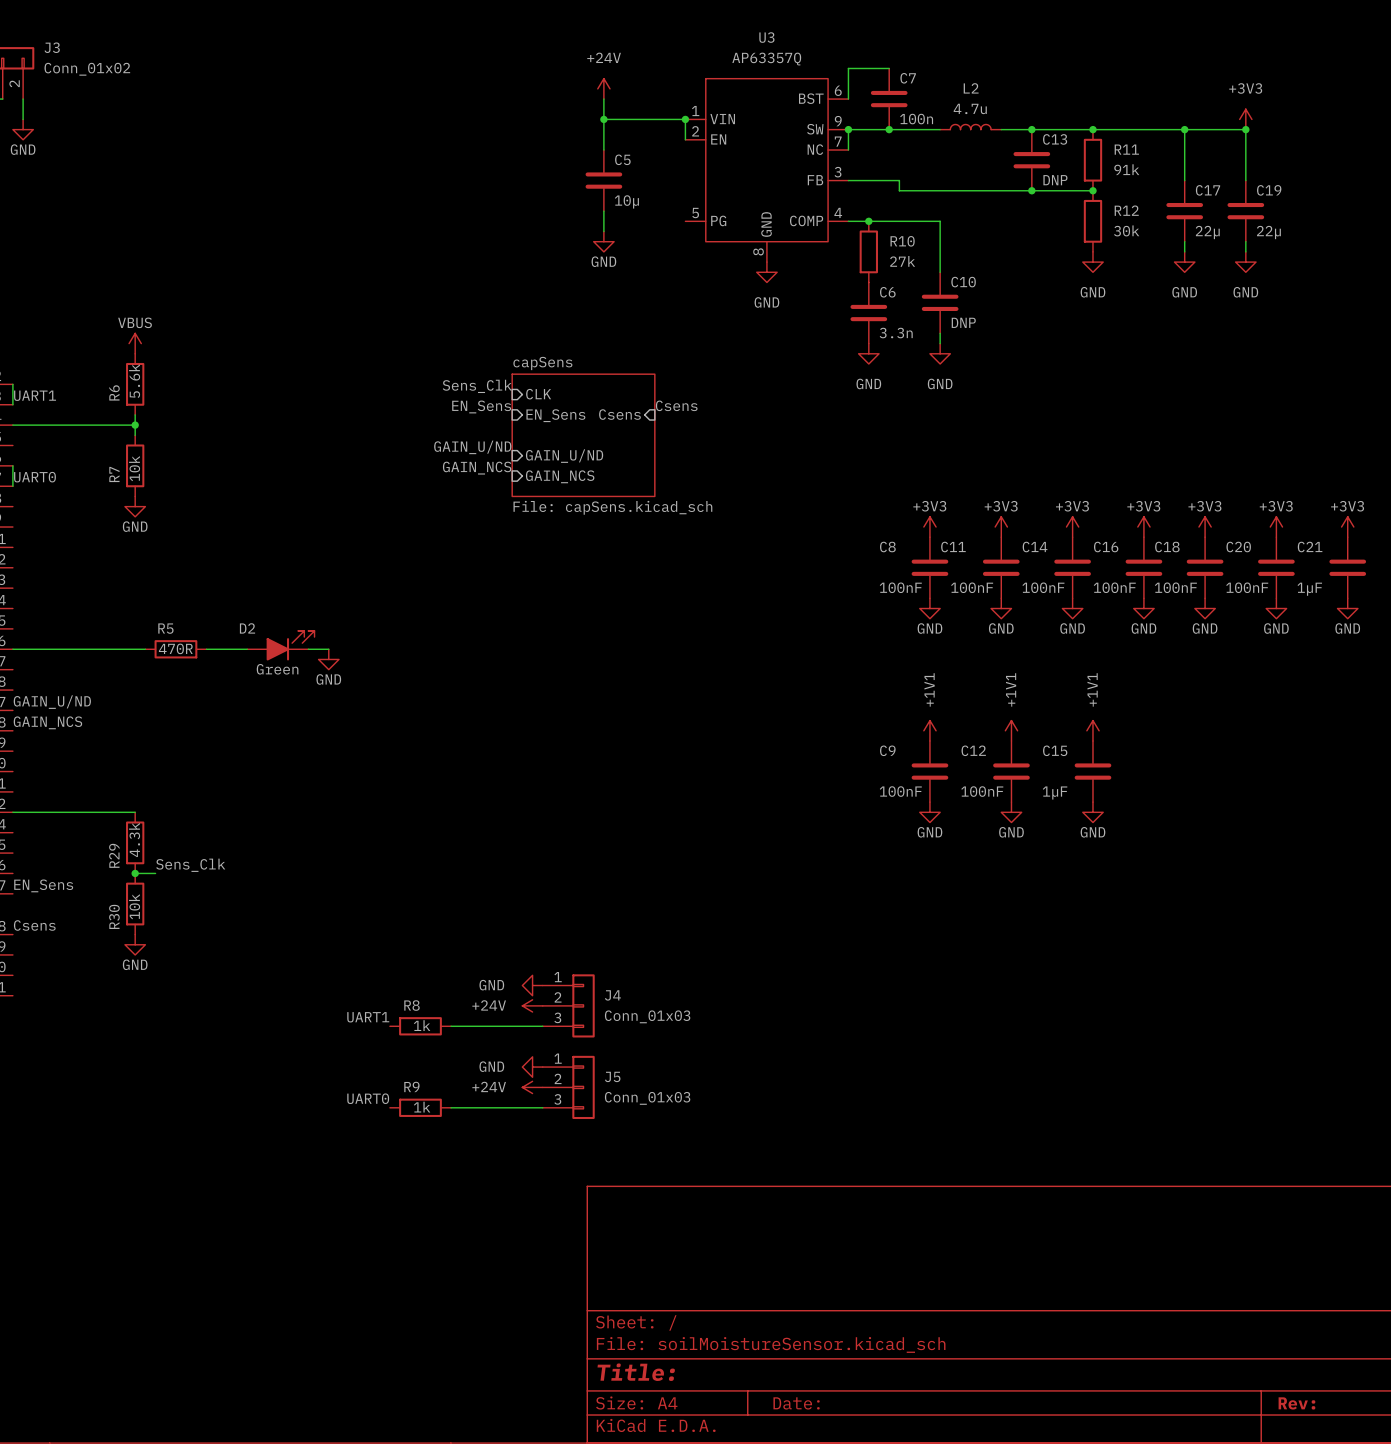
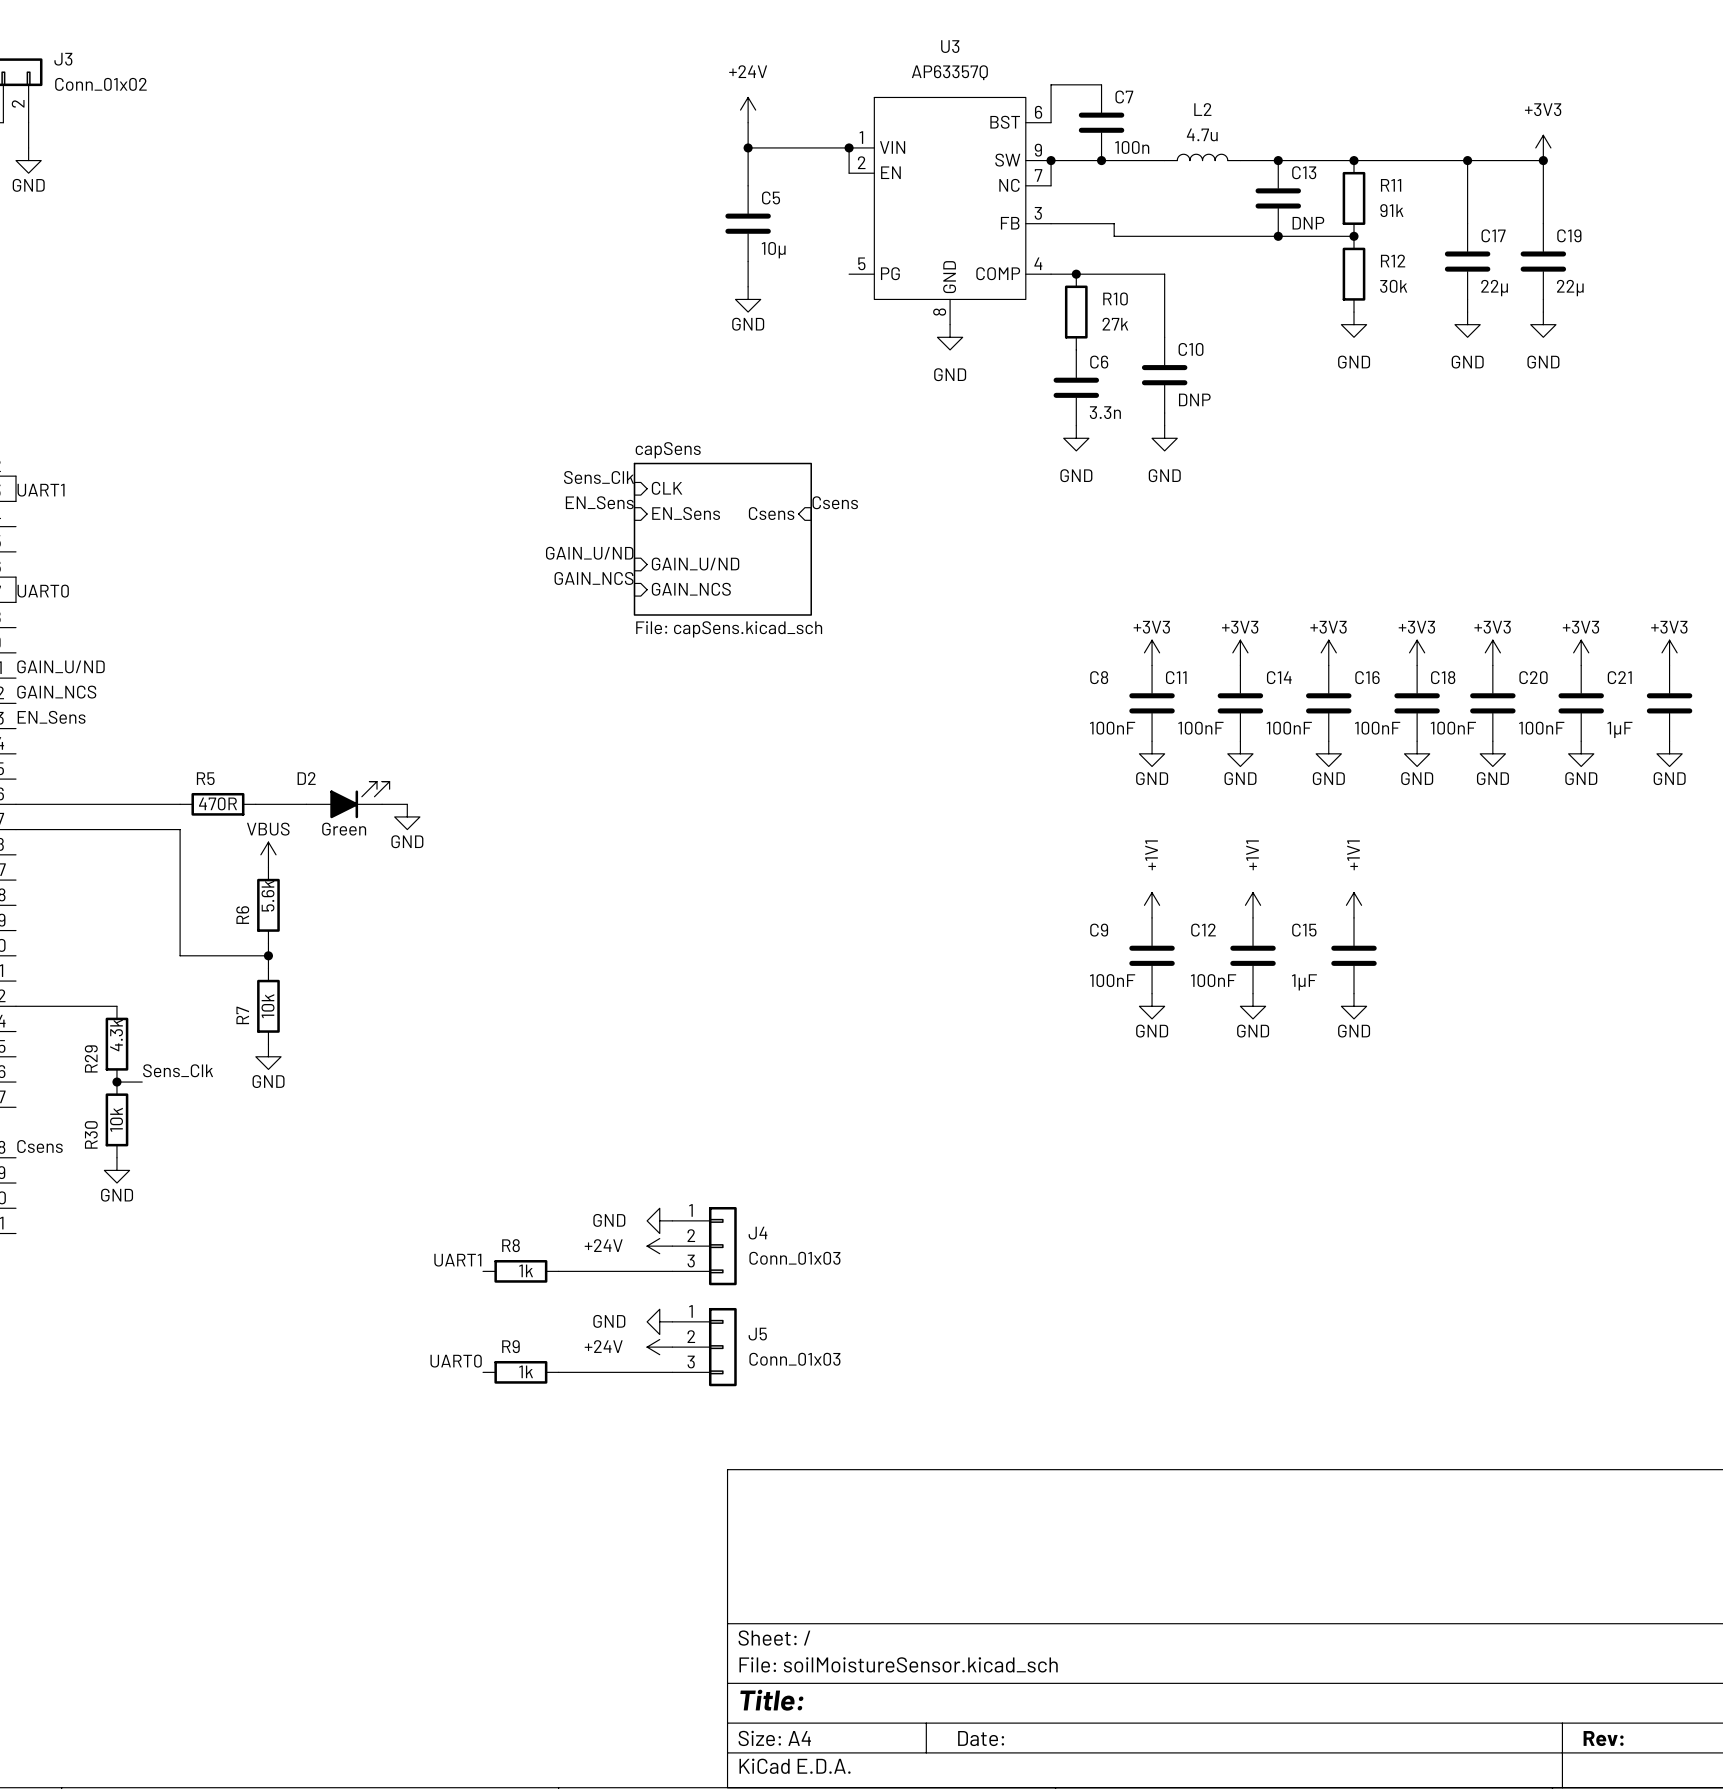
power symbol: VBUS (135, 343) -> none
R6 position: (135, 384) -> (268, 905)
wire: (135, 414) (135, 435) -> none
wire: (12, 425) (135, 425) -> none
junction: (135, 425) -> none
R7 position: (135, 465) -> (268, 1006)
power symbol: GND (135, 506) -> none
label: none -> EN_Sens (51, 717)
wire: none -> (15, 829) (180, 829) (180, 955) (268, 955)
power symbol: none -> VBUS (268, 854)
label position: GAIN_U/ND (52, 702) -> GAIN_U/ND (60, 666)
label position: GAIN_NCS (47, 722) -> GAIN_NCS (56, 692)
wire: none -> (268, 943) (268, 968)
junction: none -> (268, 955)
wire: (94, 812) (135, 812) -> none
R29 position: (135, 842) -> (116, 1044)
power symbol: none -> GND (268, 1056)
label position: Sens_Clk (190, 865) -> Sens_Clk (178, 1070)
wire: (135, 873) (155, 873) -> (116, 1082) (142, 1082)
junction position: (135, 873) -> (116, 1082)
label: EN_Sens (43, 885) -> none
R30 position: (135, 904) -> (116, 1119)
power symbol position: GND (135, 944) -> GND (116, 1170)

